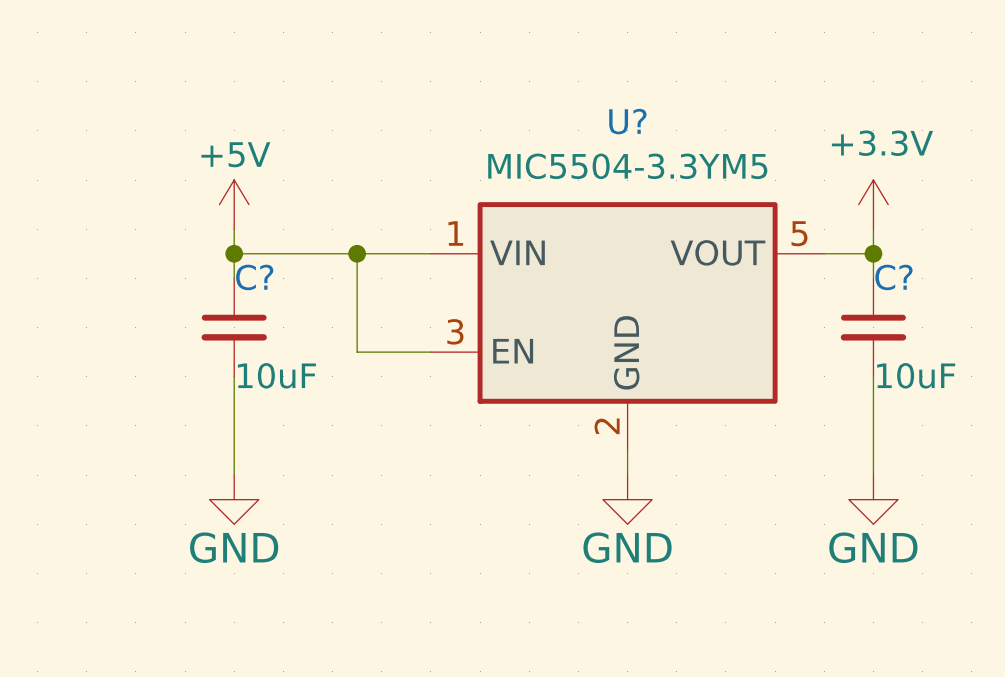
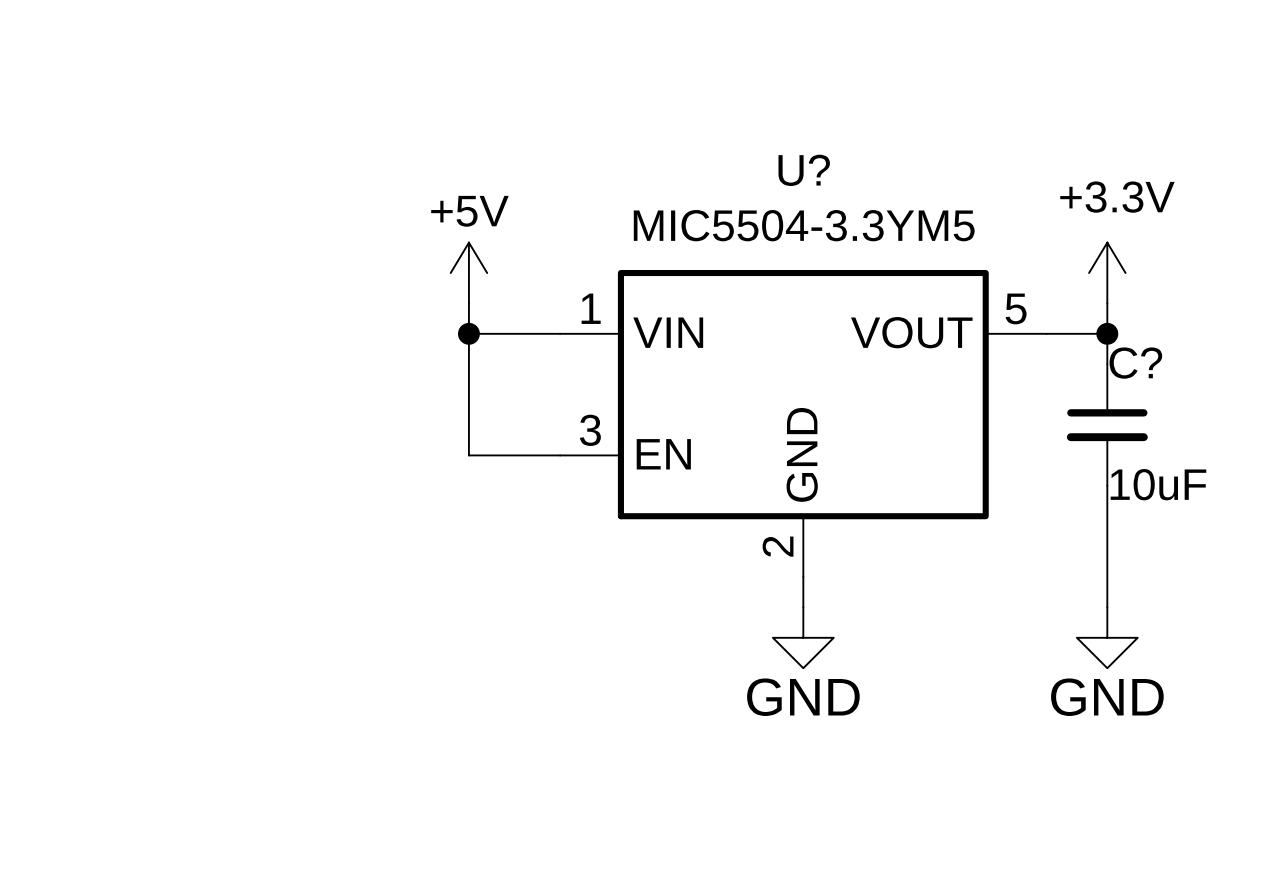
power symbol position: +5V (234, 204) -> +5V (468, 273)
wire: (234, 229) (234, 278) -> none
wire: (234, 253) (357, 253) -> (468, 303) (468, 333)
junction: (234, 253) -> none
C?: 10uF (234, 327) -> none
wire: (234, 376) (234, 475) -> none
power symbol: GND (234, 499) -> none

